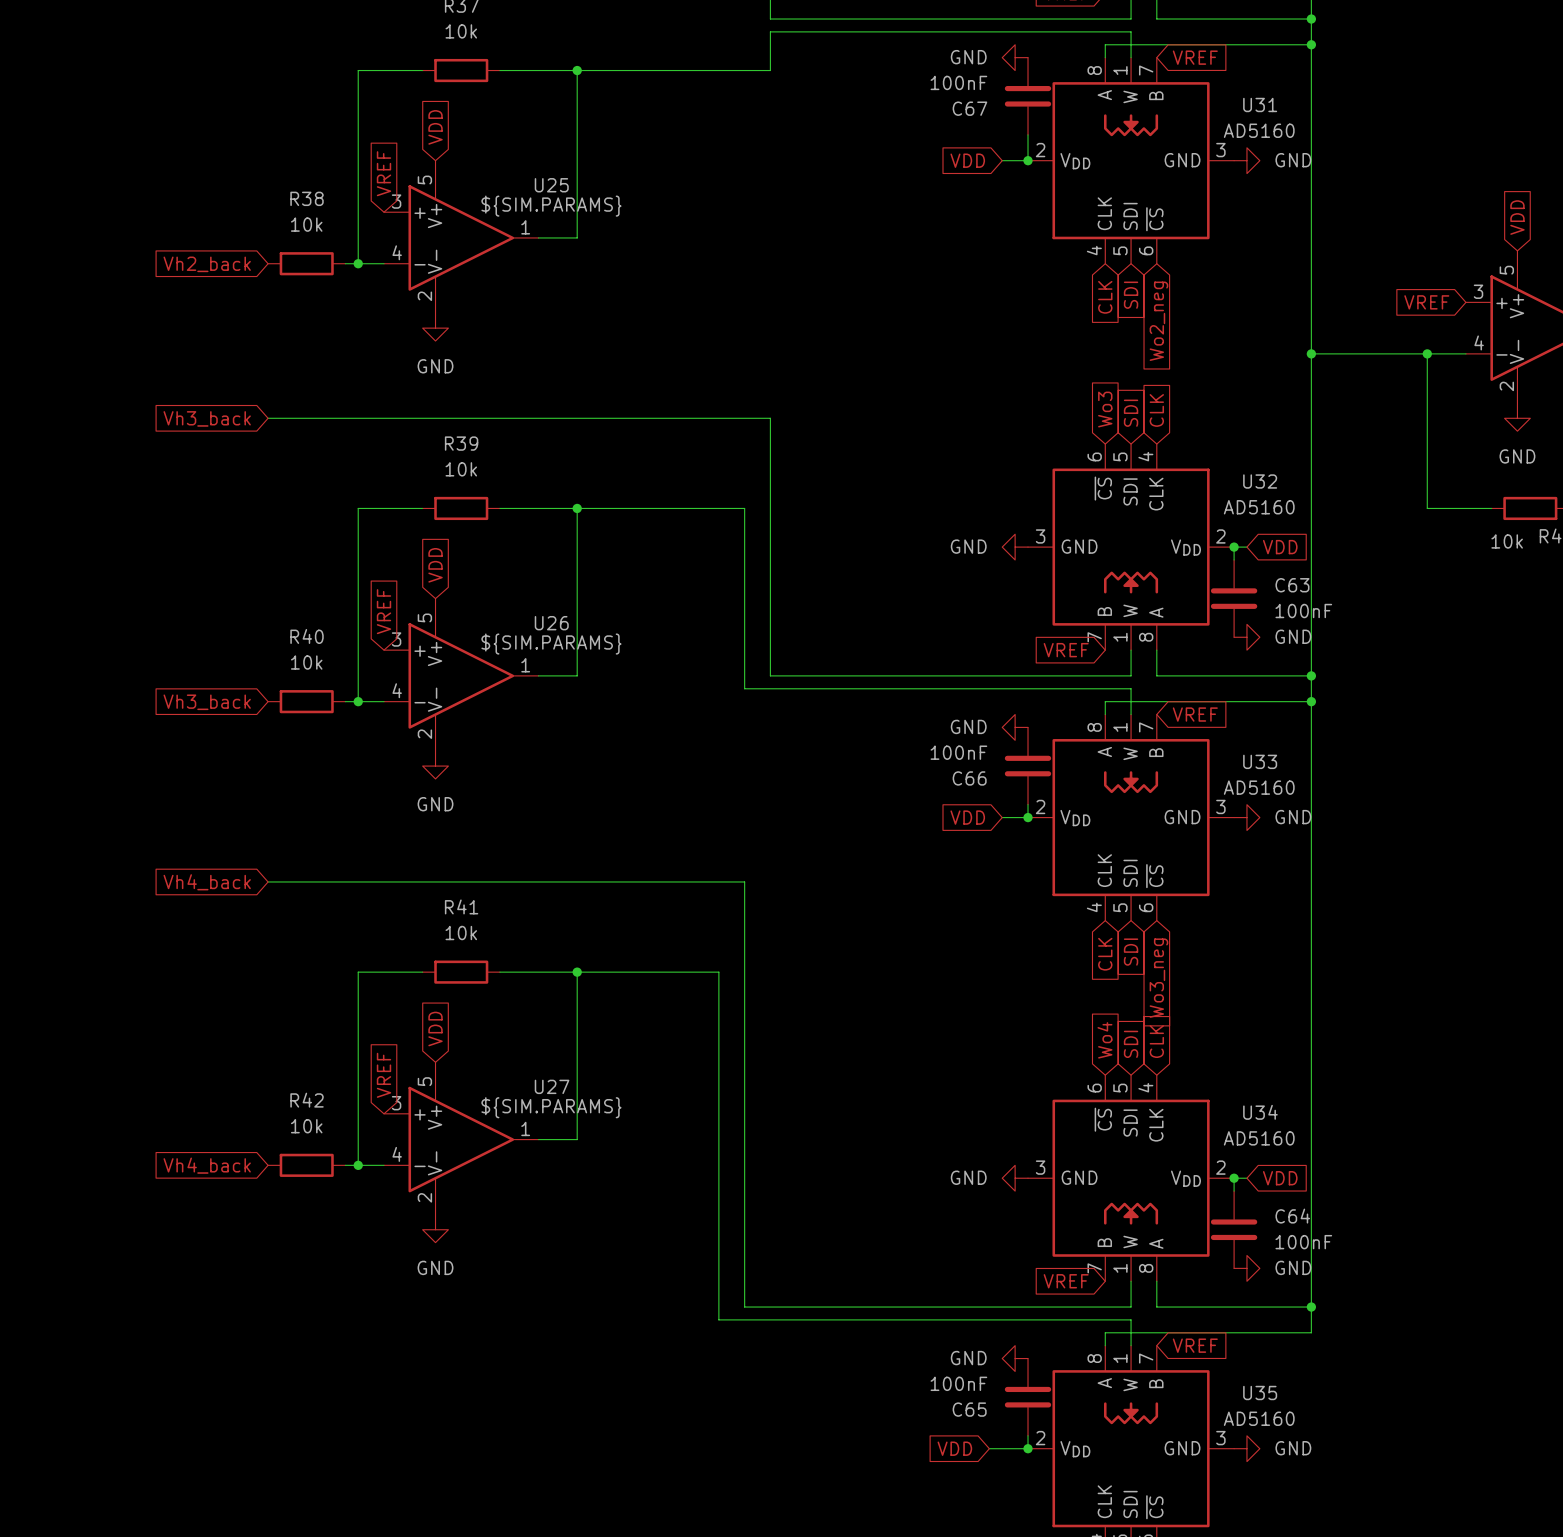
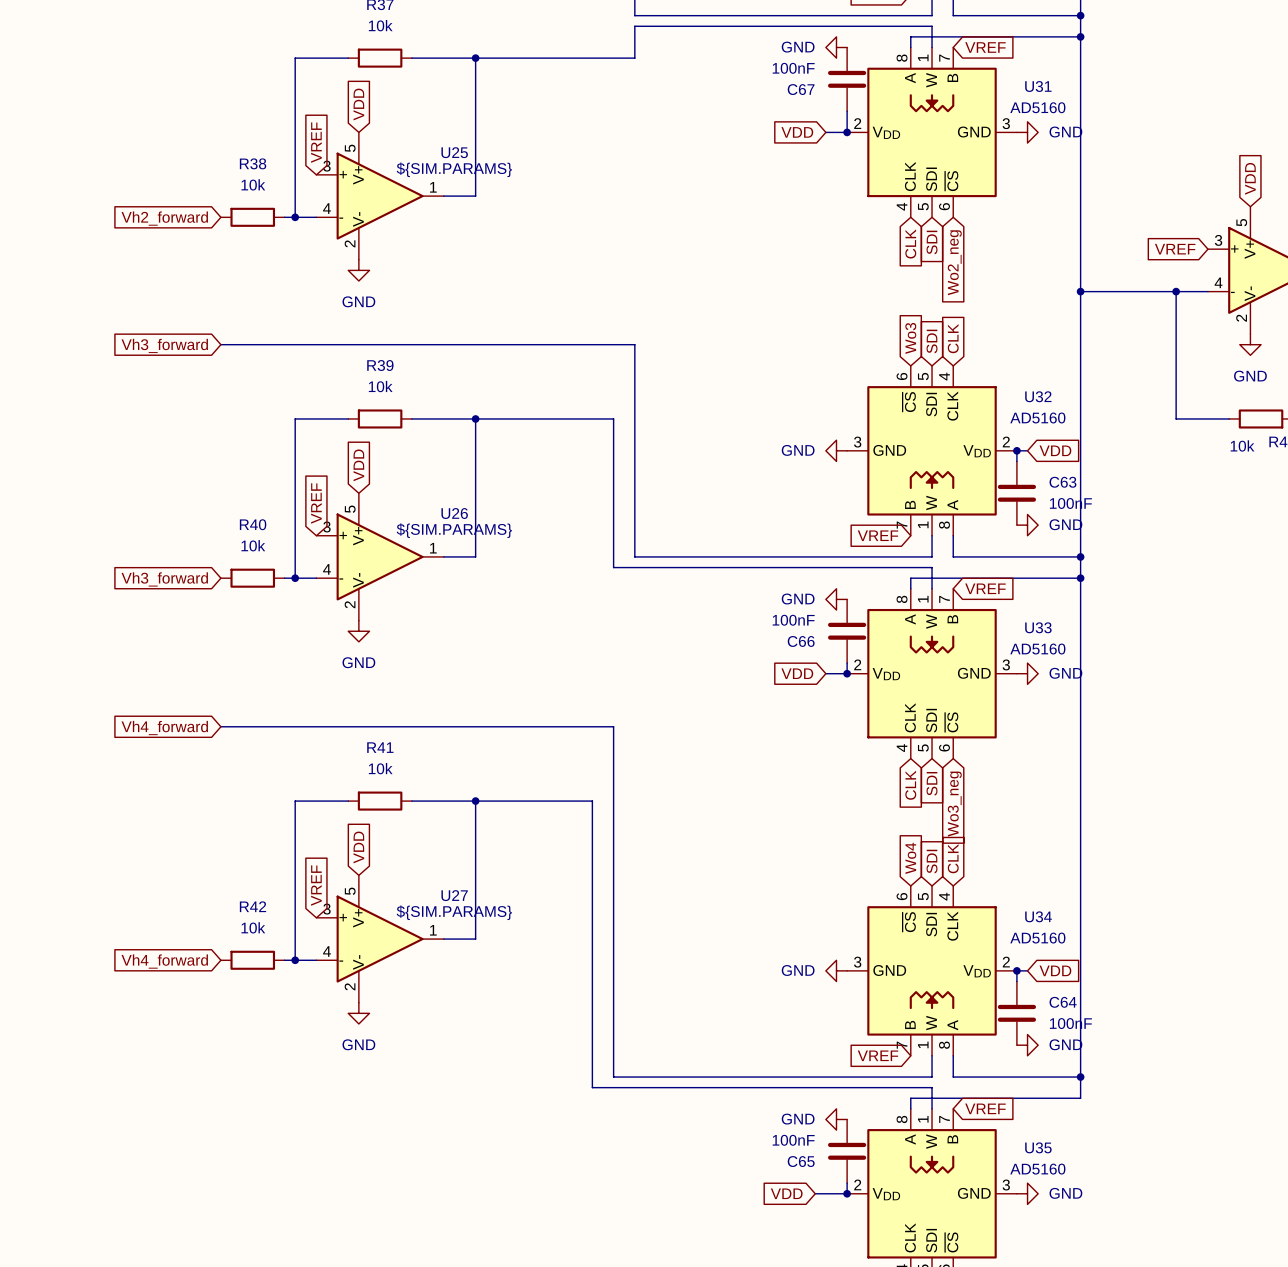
global label: Vh2_back (207, 264) -> Vh2_forward (164, 218)
global label: Vh3_back (207, 418) -> Vh3_forward (164, 345)
global label: Vh3_back (207, 702) -> Vh3_forward (164, 579)
global label: Vh4_back (207, 882) -> Vh4_forward (164, 728)
global label: Vh4_back (207, 1165) -> Vh4_forward (164, 961)

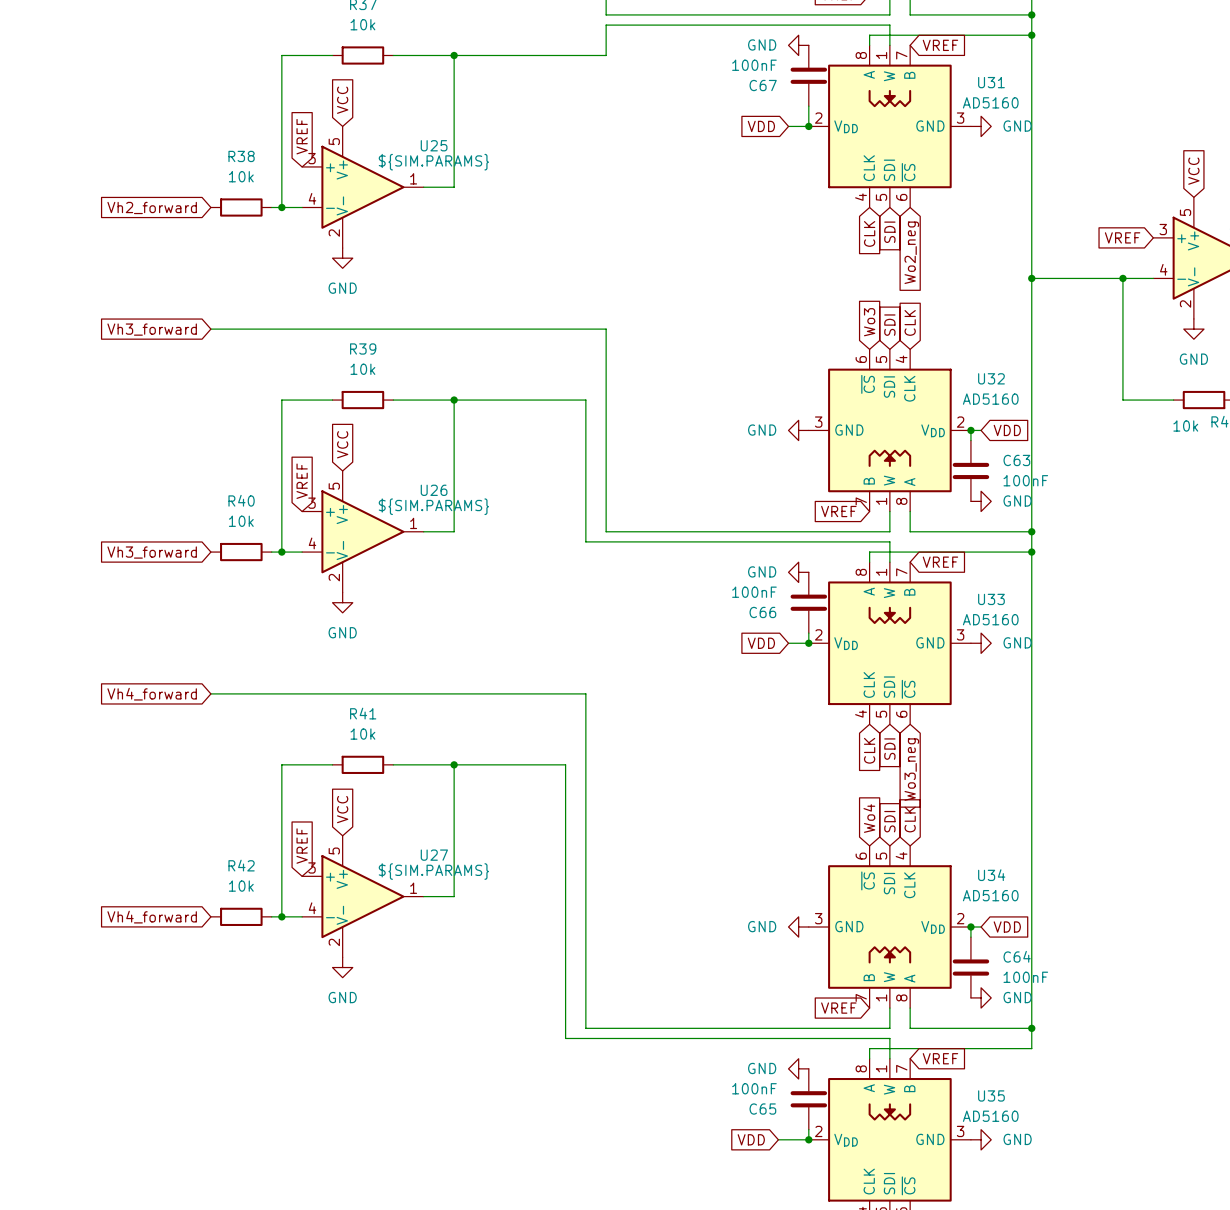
global label: VDD (358, 104) -> VCC (342, 100)
global label: VDD (1250, 178) -> VCC (1193, 171)
global label: VDD (358, 465) -> VCC (342, 444)
global label: VDD (358, 847) -> VCC (342, 809)

